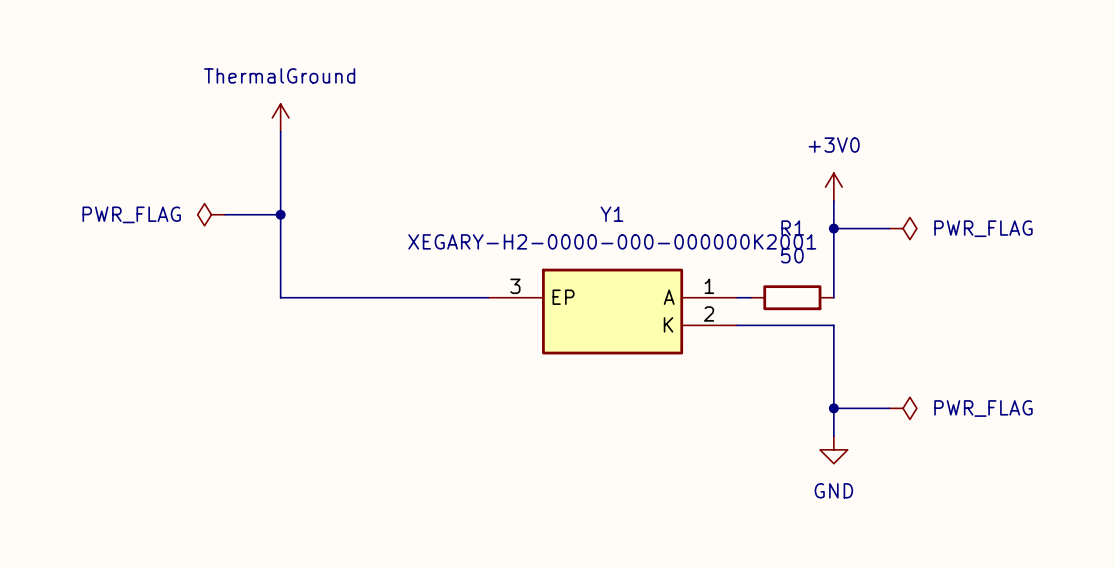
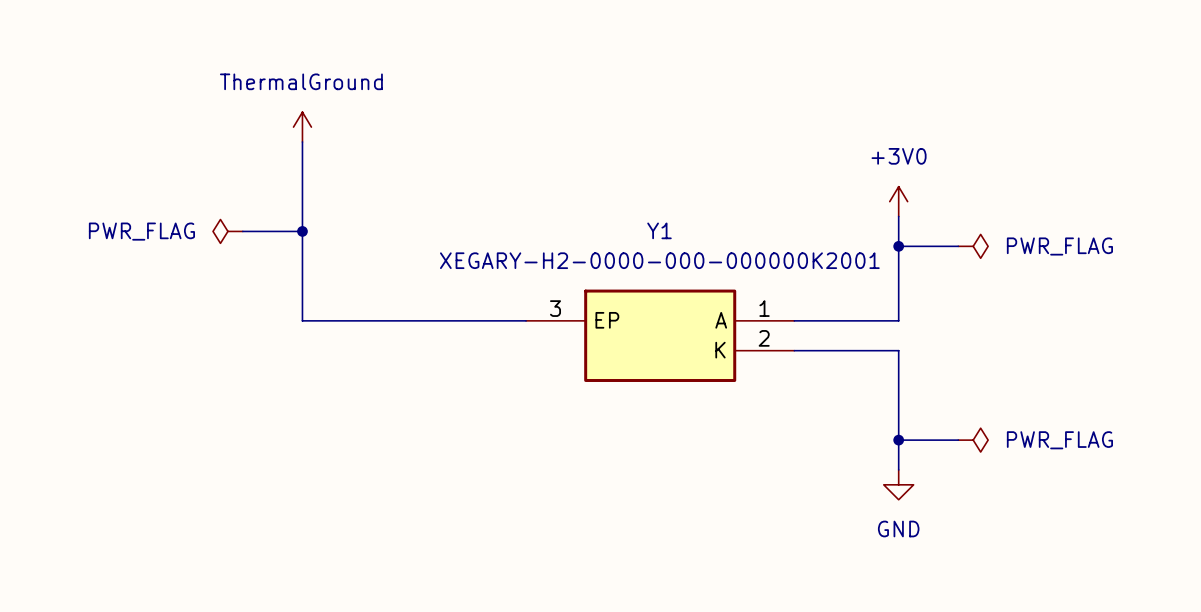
wire: none -> (809, 320) (898, 320)
R1: 50 (792, 297) -> none

